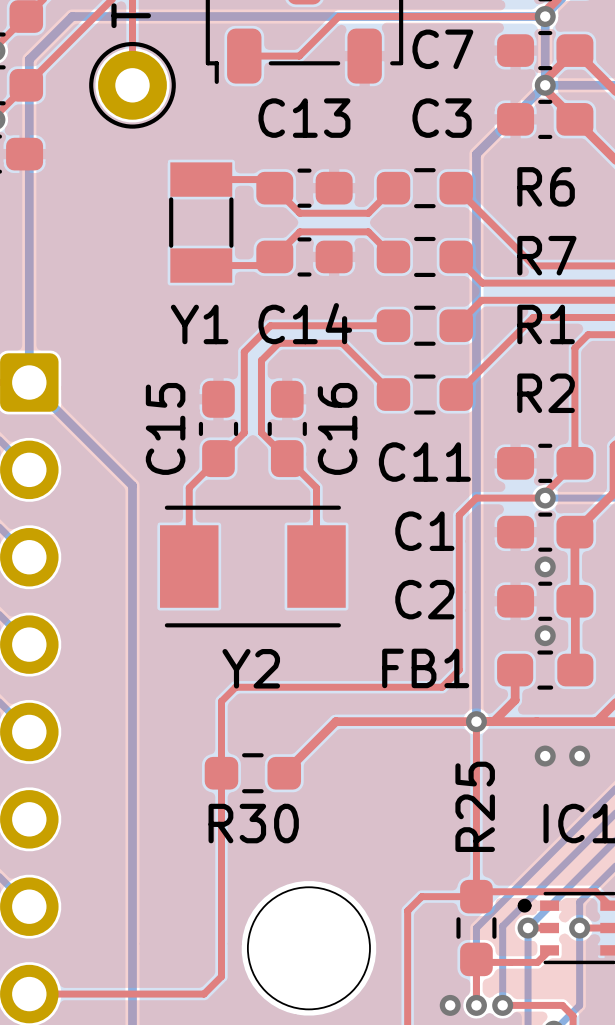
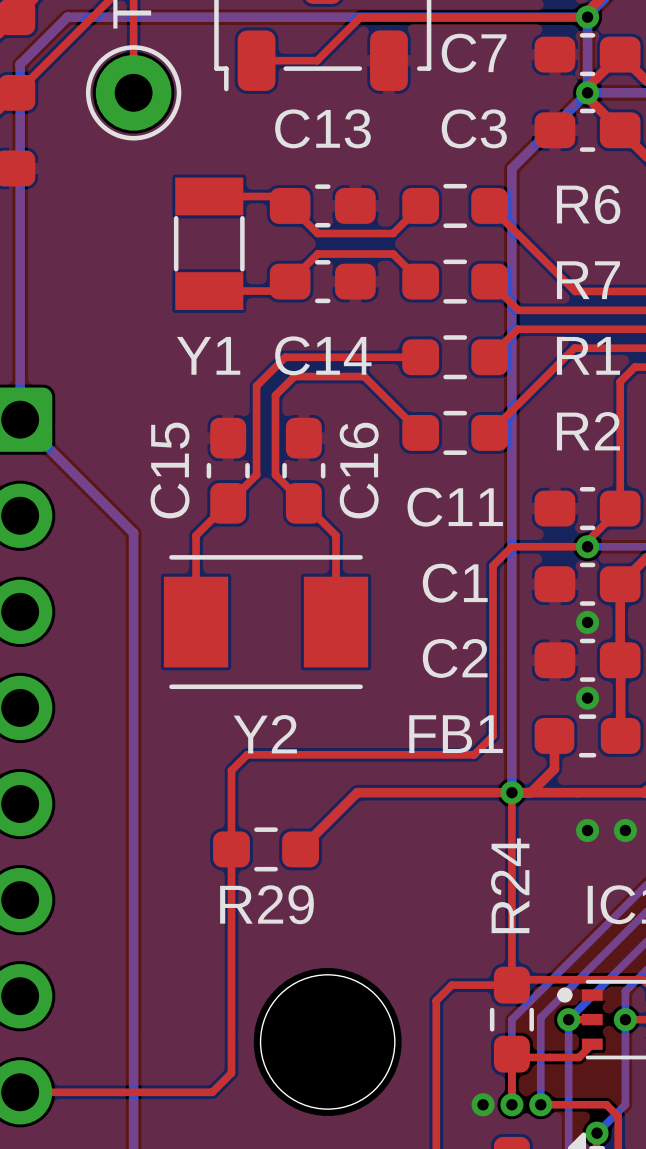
R25 name: R25 (475, 806) -> R24 (510, 885)
R30 name: R30 (253, 823) -> R29 (266, 904)

